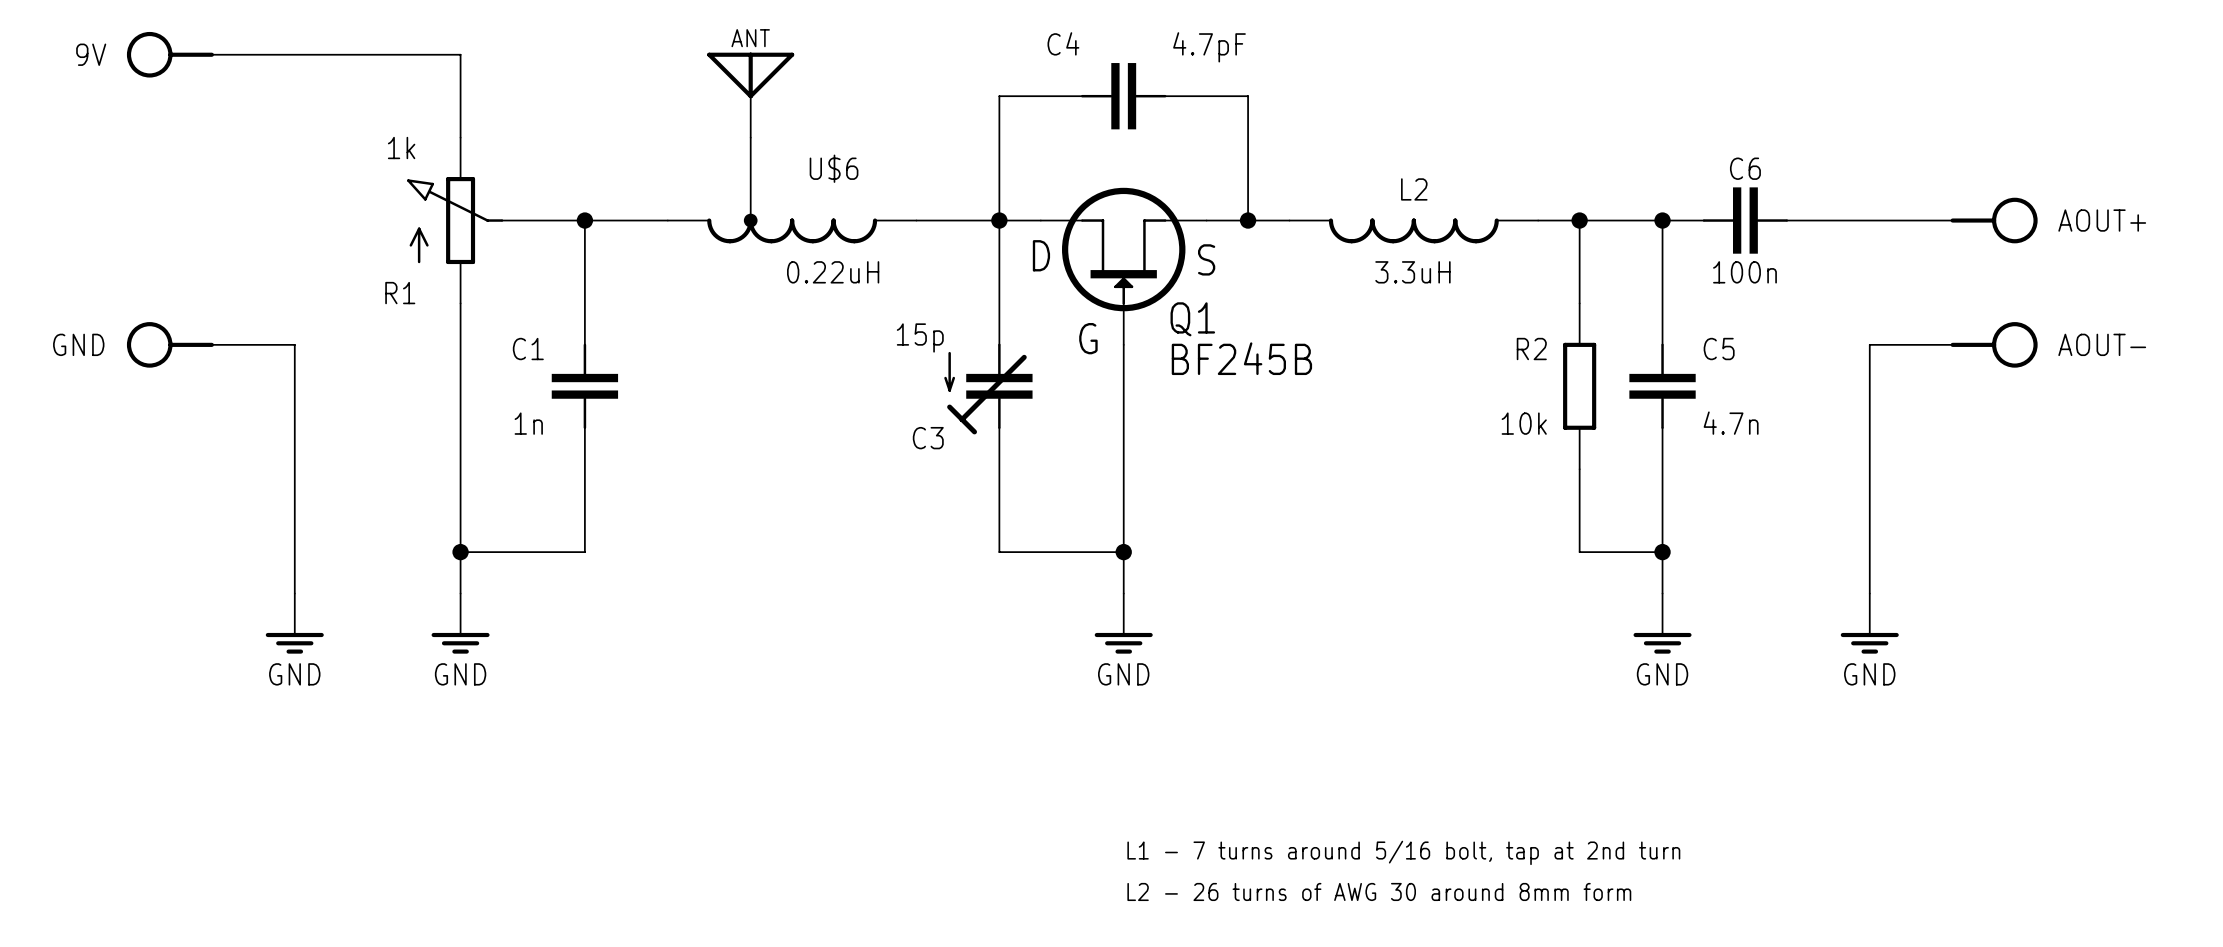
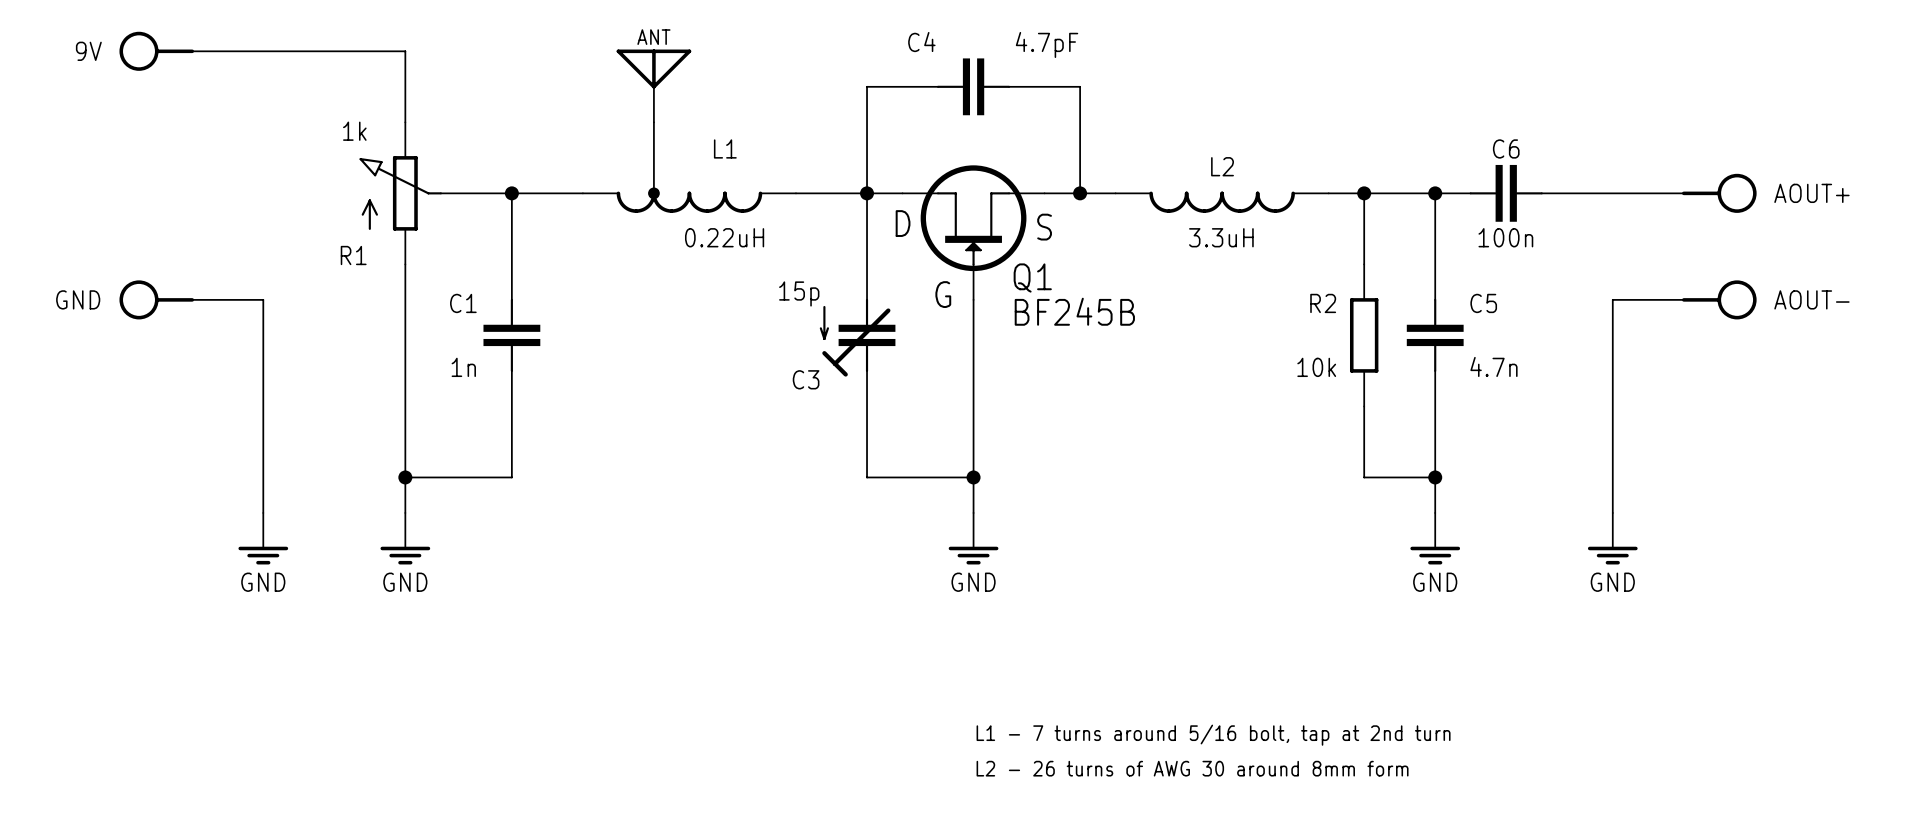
U$6 name: U$6 (834, 168) -> L1 (725, 148)

